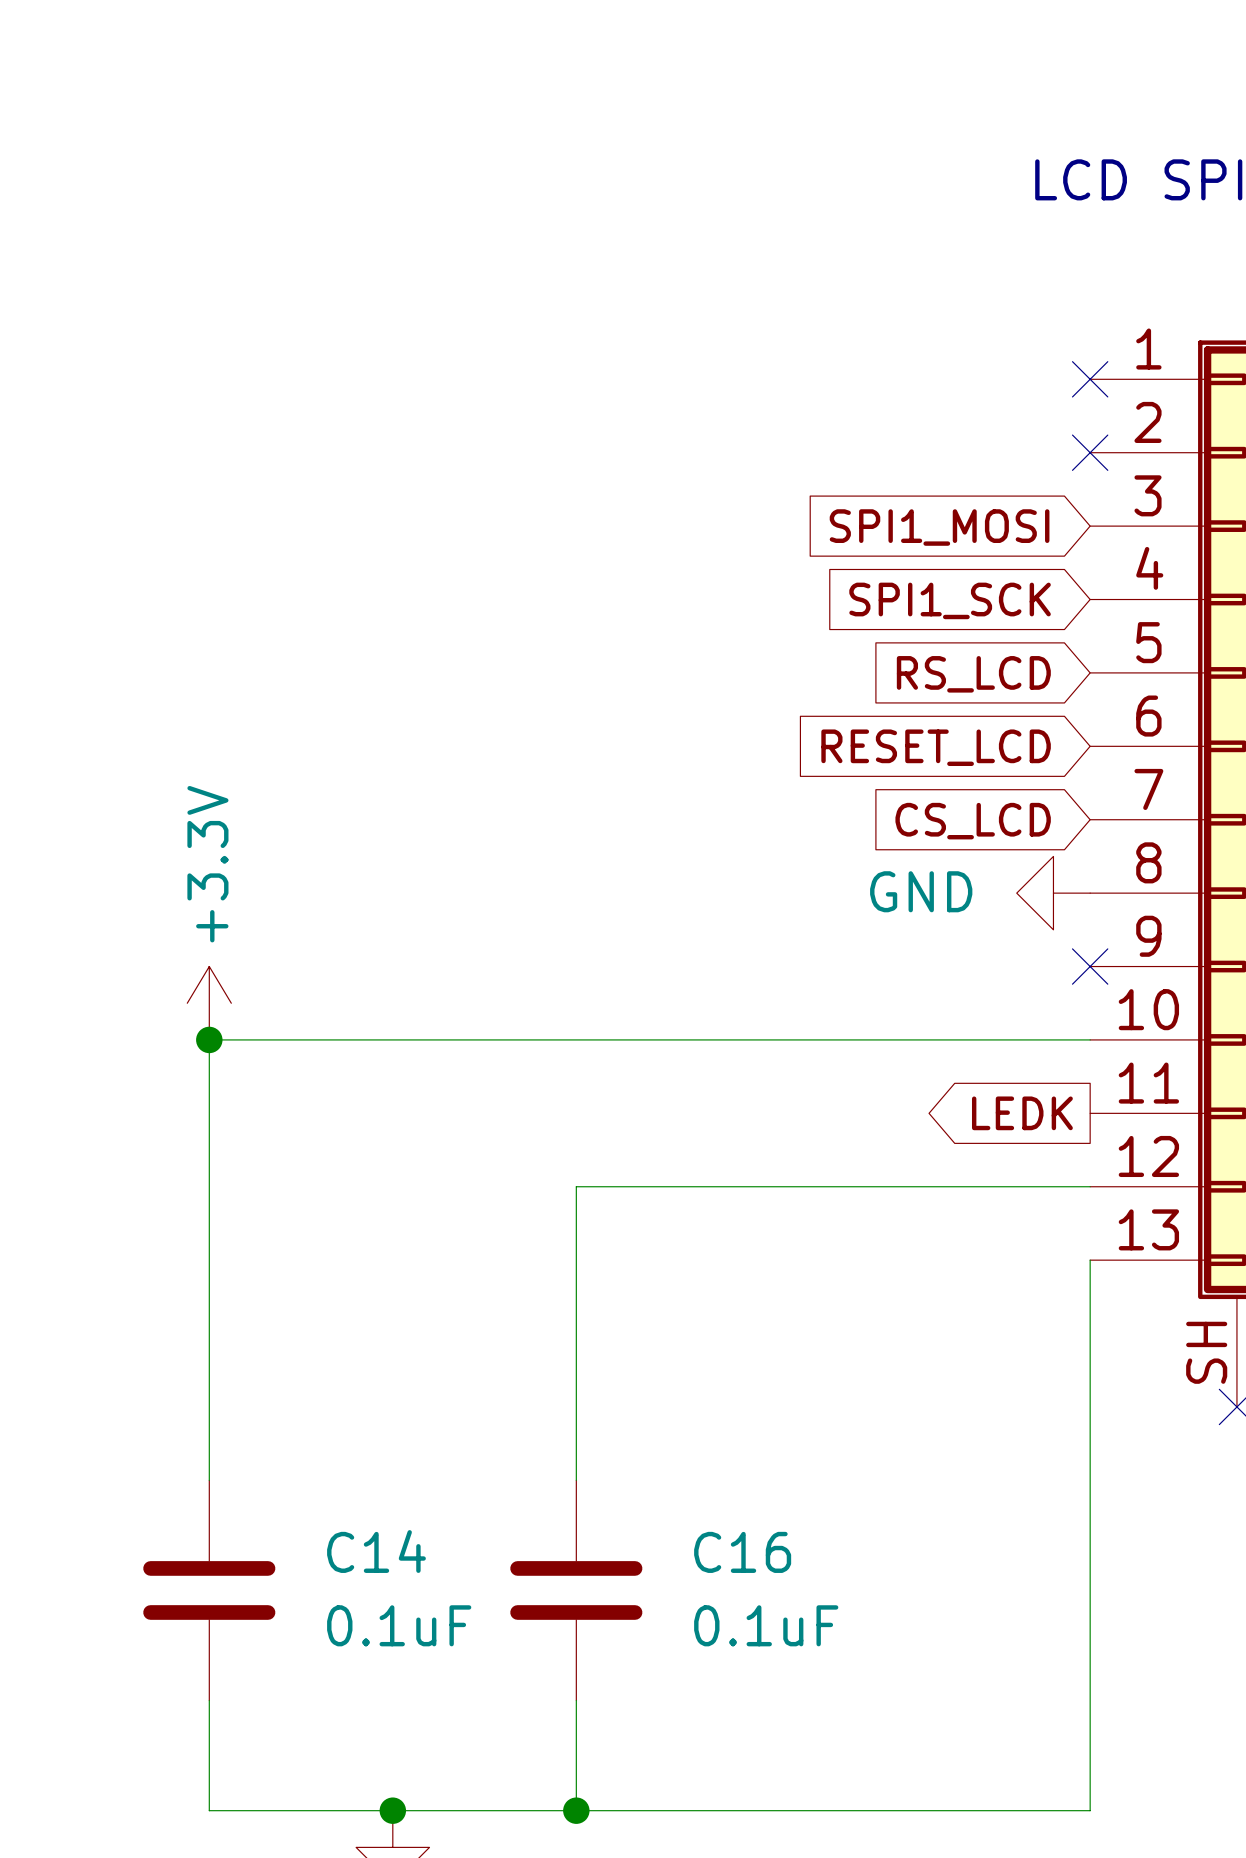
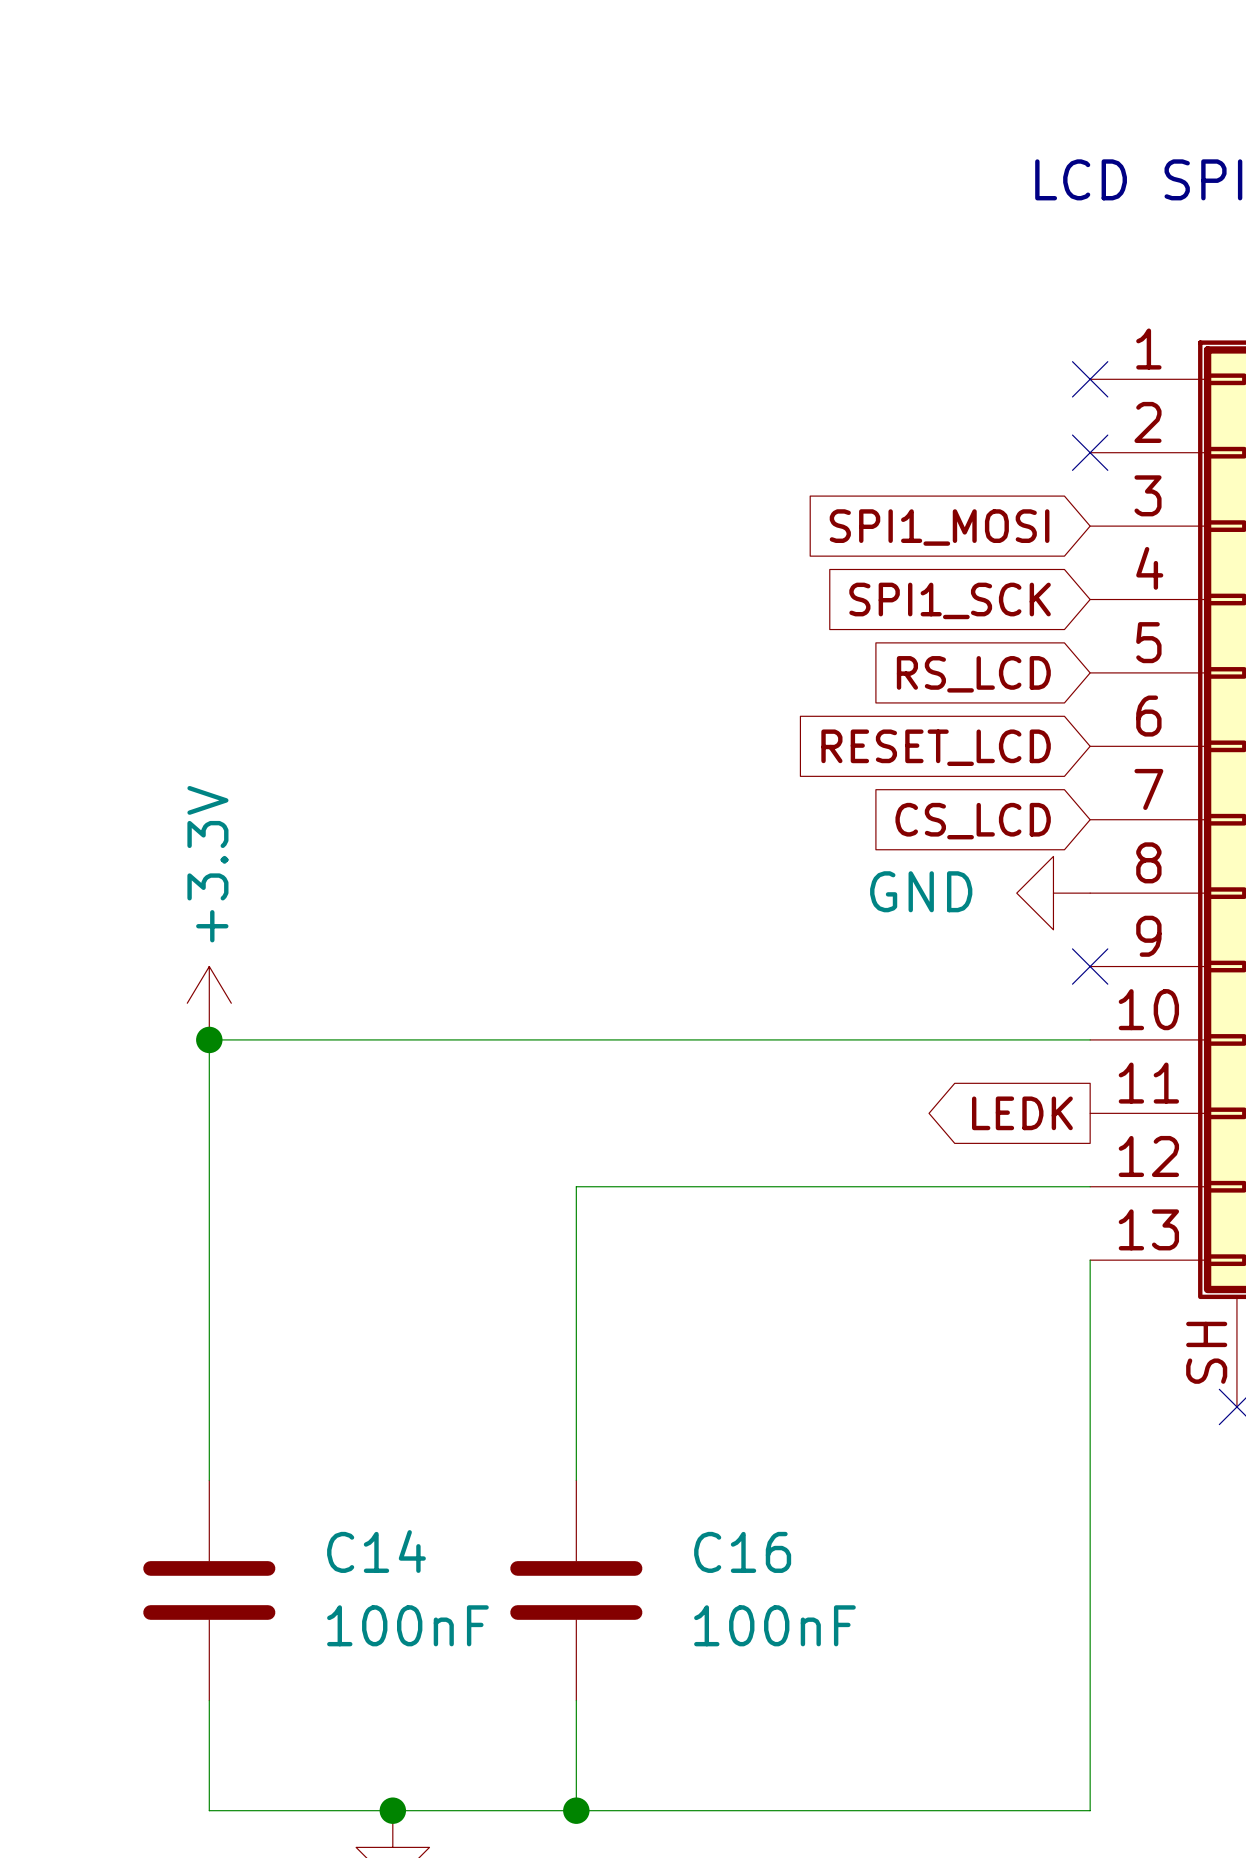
C14 value: 0.1uF (399, 1625) -> 100nF (407, 1625)
C16 value: 0.1uF (766, 1625) -> 100nF (774, 1625)

